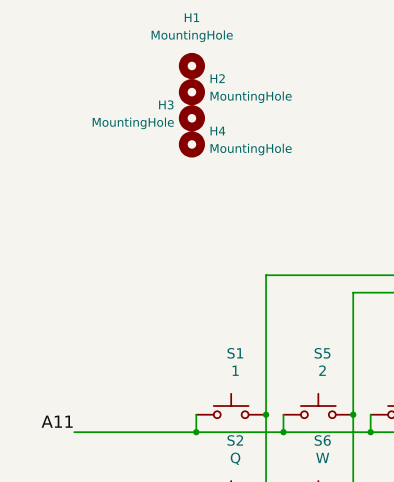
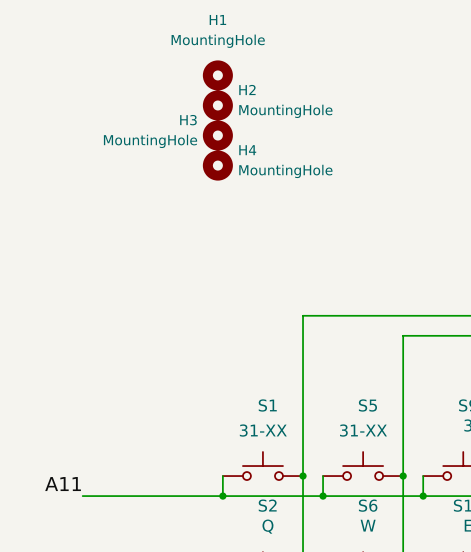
S1 value: 1 (235, 370) -> 31-XX (263, 430)
S5 value: 2 (322, 370) -> 31-XX (363, 430)

